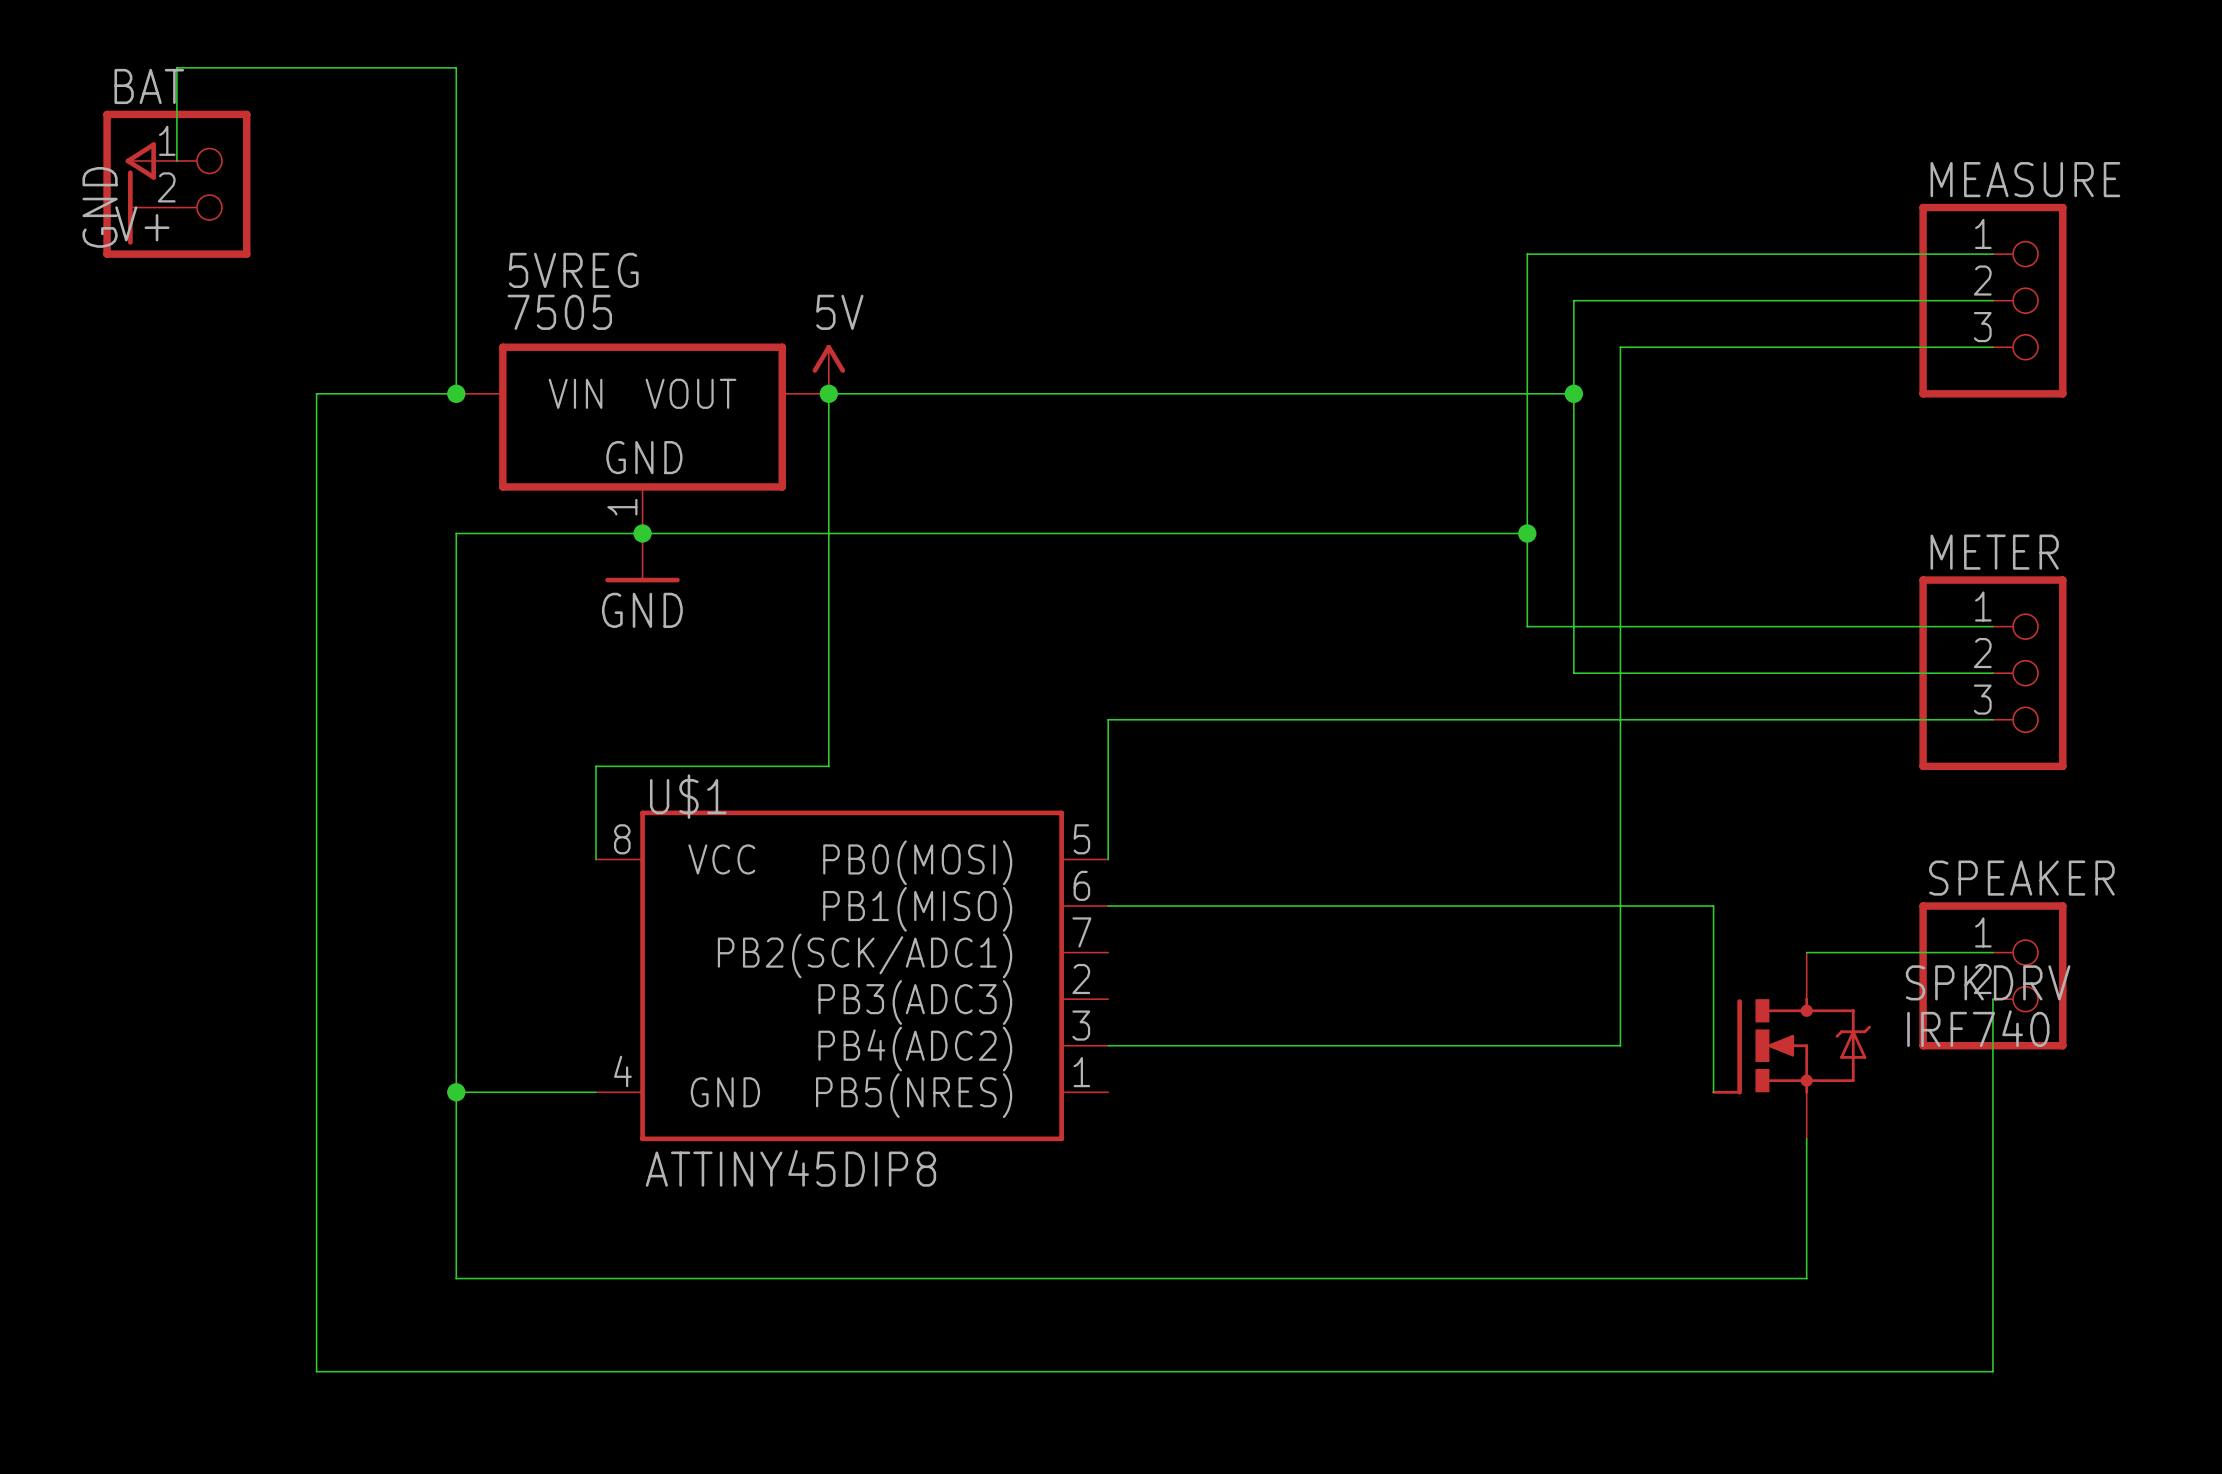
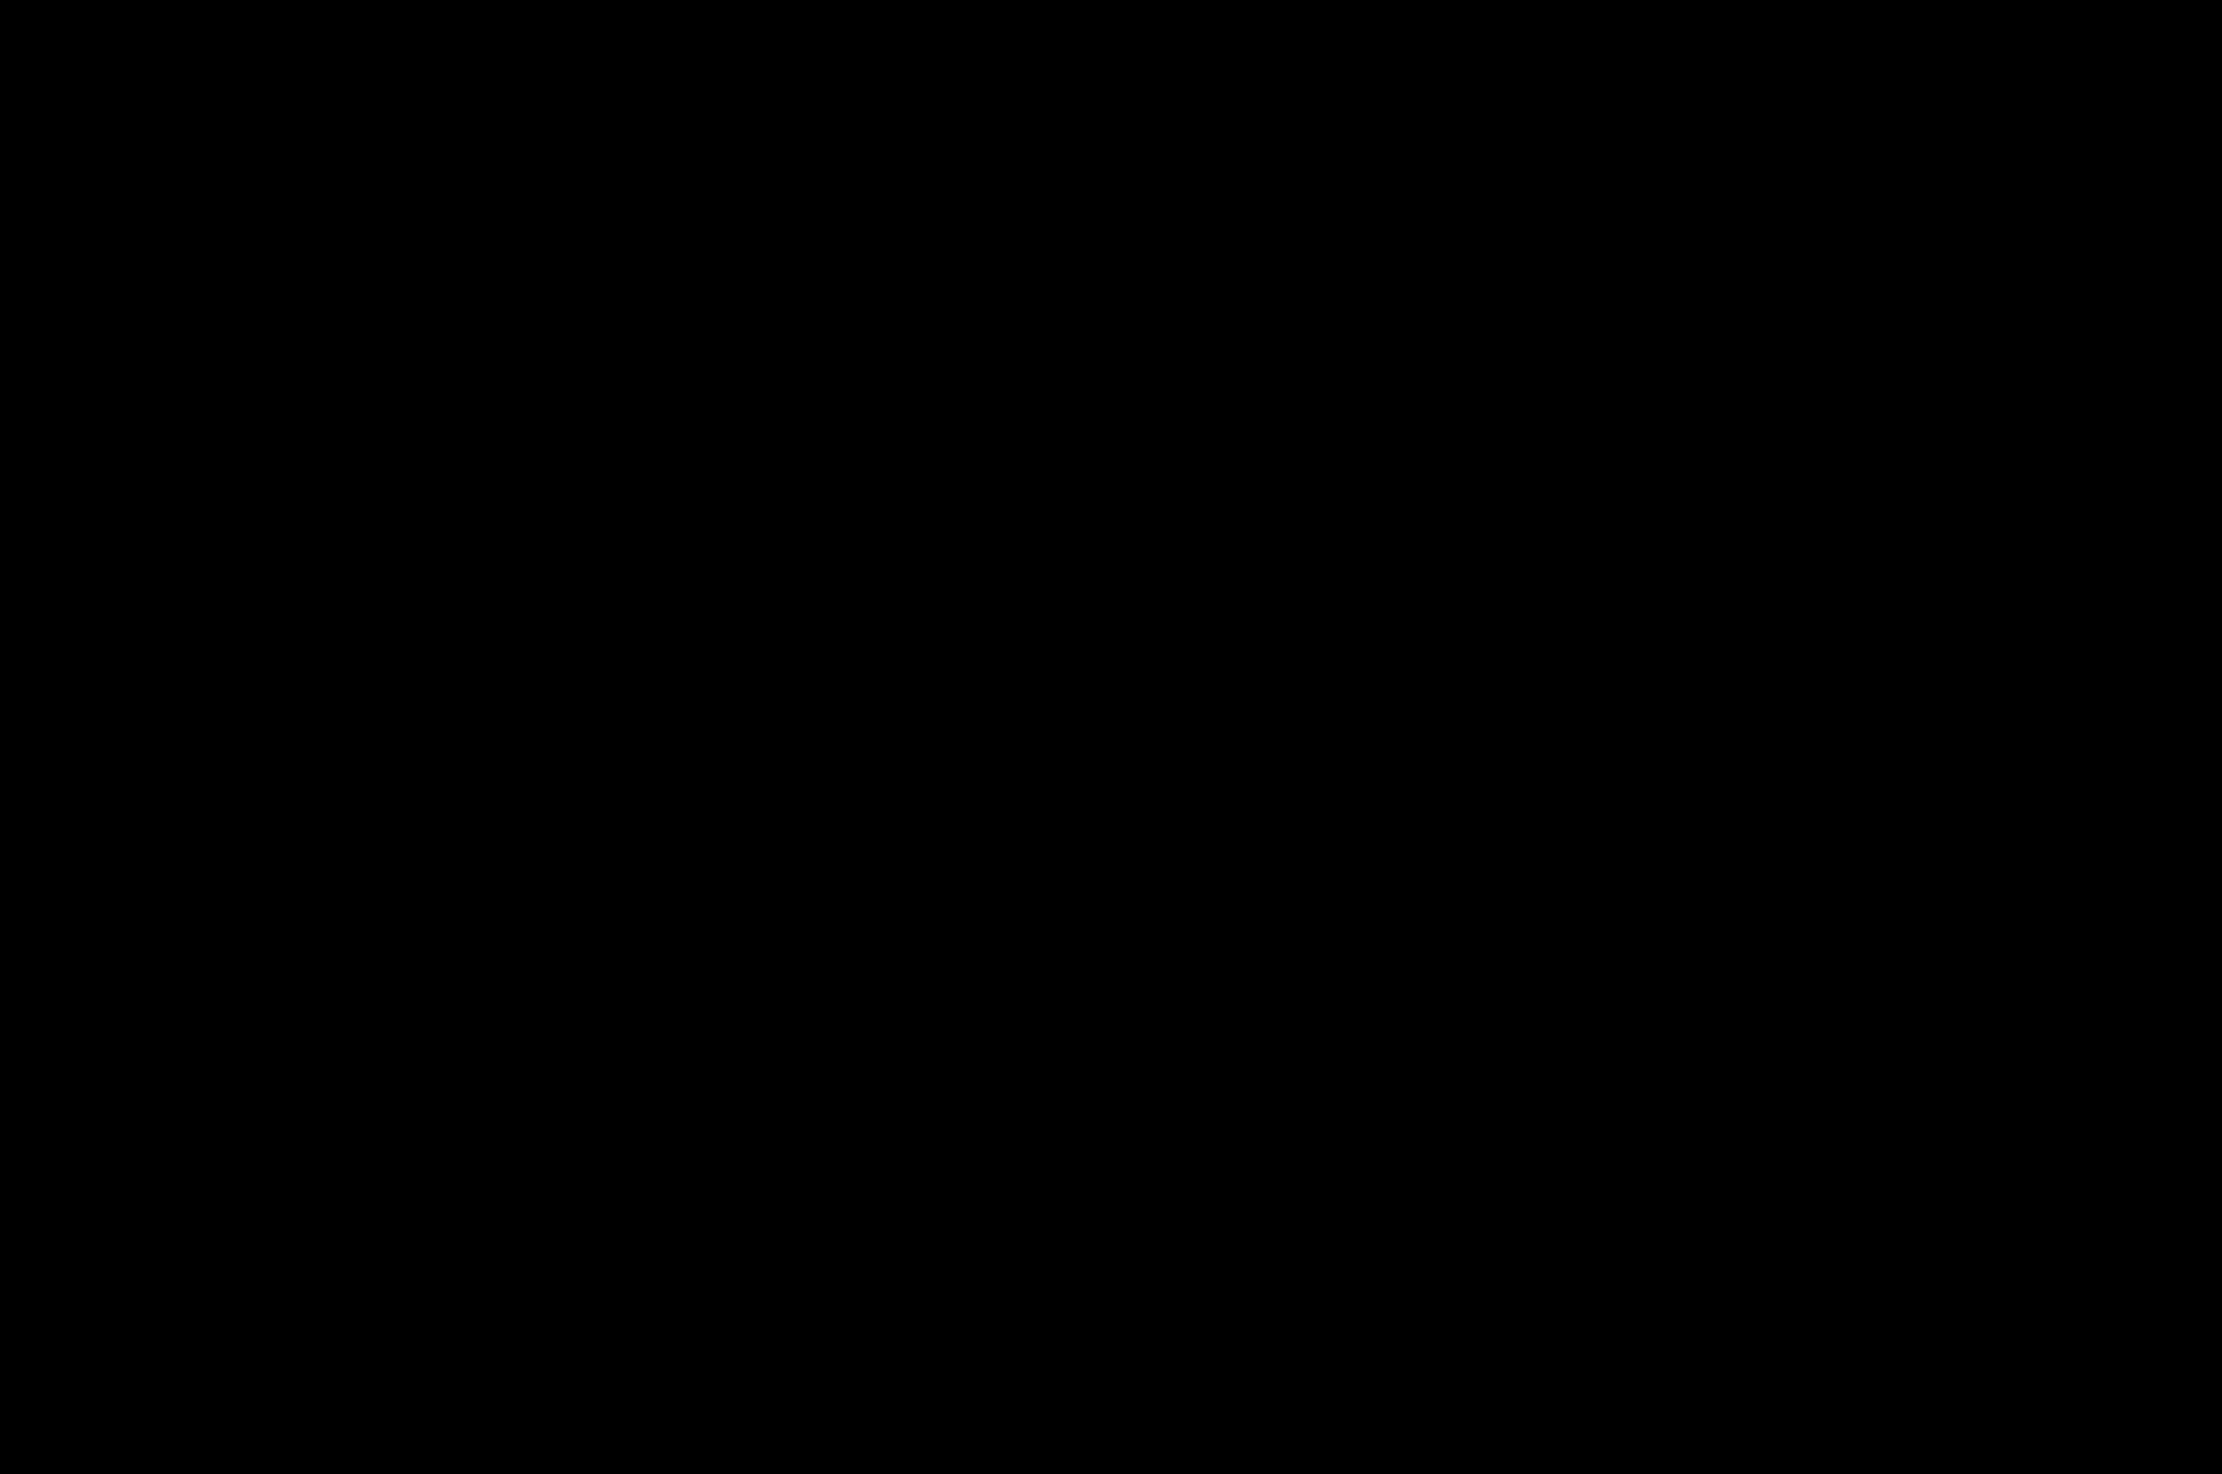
power symbol: V+ (151, 160) -> none
wire: (176, 160) (176, 67) (456, 67) (456, 393) (316, 393) (316, 1371) (1992, 1371) (1992, 999) -> none
BAT: (176, 184) -> none
power symbol: GND (152, 207) -> none
wire: (1992, 254) (1527, 254) (1527, 626) (1992, 626) -> none
wire: (1992, 300) (1573, 300) (1573, 673) (1992, 673) -> none
MEASURE: (1992, 300) -> none
wire: (1992, 347) (1620, 347) (1620, 1045) (1108, 1045) -> none
power symbol: 5V (828, 369) -> none
junction: (456, 393) -> none
junction: (828, 393) -> none
wire: (1573, 393) (828, 393) (828, 766) (595, 766) (595, 859) -> none
junction: (1573, 393) -> none
5VREG: 7505 (642, 438) -> none
junction: (642, 533) -> none
wire: (1527, 533) (456, 533) (456, 1278) (1806, 1278) (1806, 1138) -> none
junction: (1527, 533) -> none
power symbol: GND (642, 557) -> none
METER: (1992, 673) -> none
wire: (1992, 719) (1108, 719) (1108, 859) -> none
wire: (1108, 906) (1713, 906) (1713, 1092) -> none
wire: (1806, 952) (1992, 952) -> none
U$1: ATTINY45DIP8 (852, 975) -> none
SPEAKER: (1992, 975) -> none
SPKDRV: IRF740 (1791, 1045) -> none
wire: (456, 1092) (595, 1092) -> none
junction: (456, 1092) -> none

